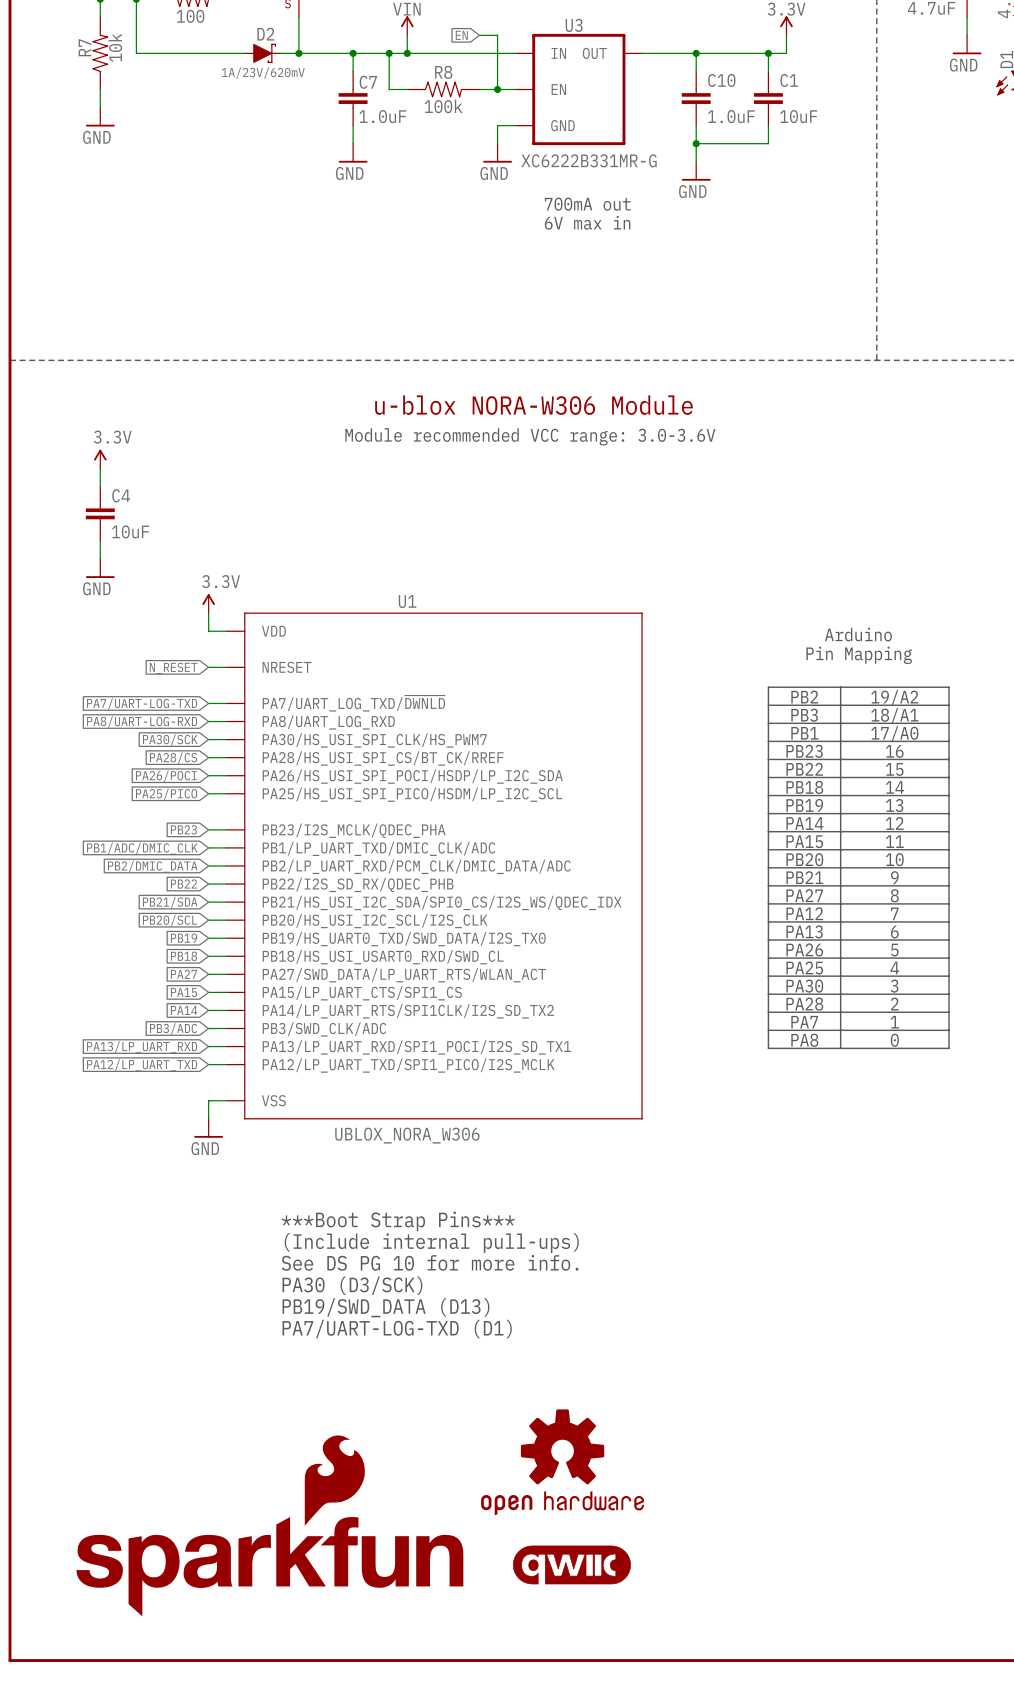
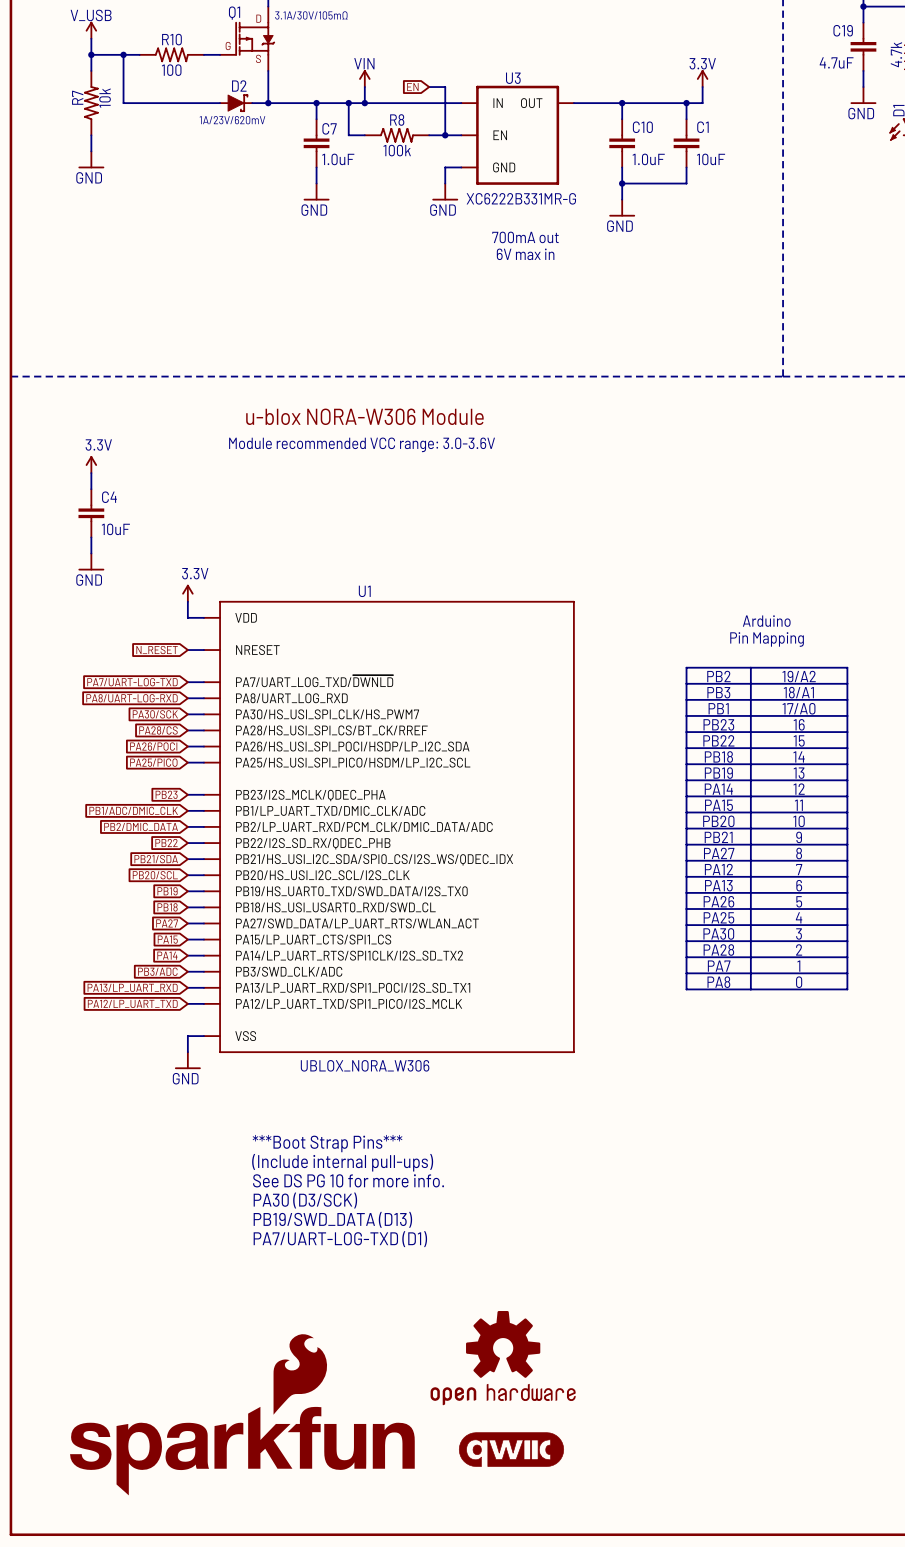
text position: u-blox NORA-W306 Module (533, 405) -> u-blox NORA-W306 Module (364, 416)
text position: Module recommended VCC range: 3.0-3.6V (530, 436) -> Module recommended VCC range: 3.0-3.6V (362, 444)

